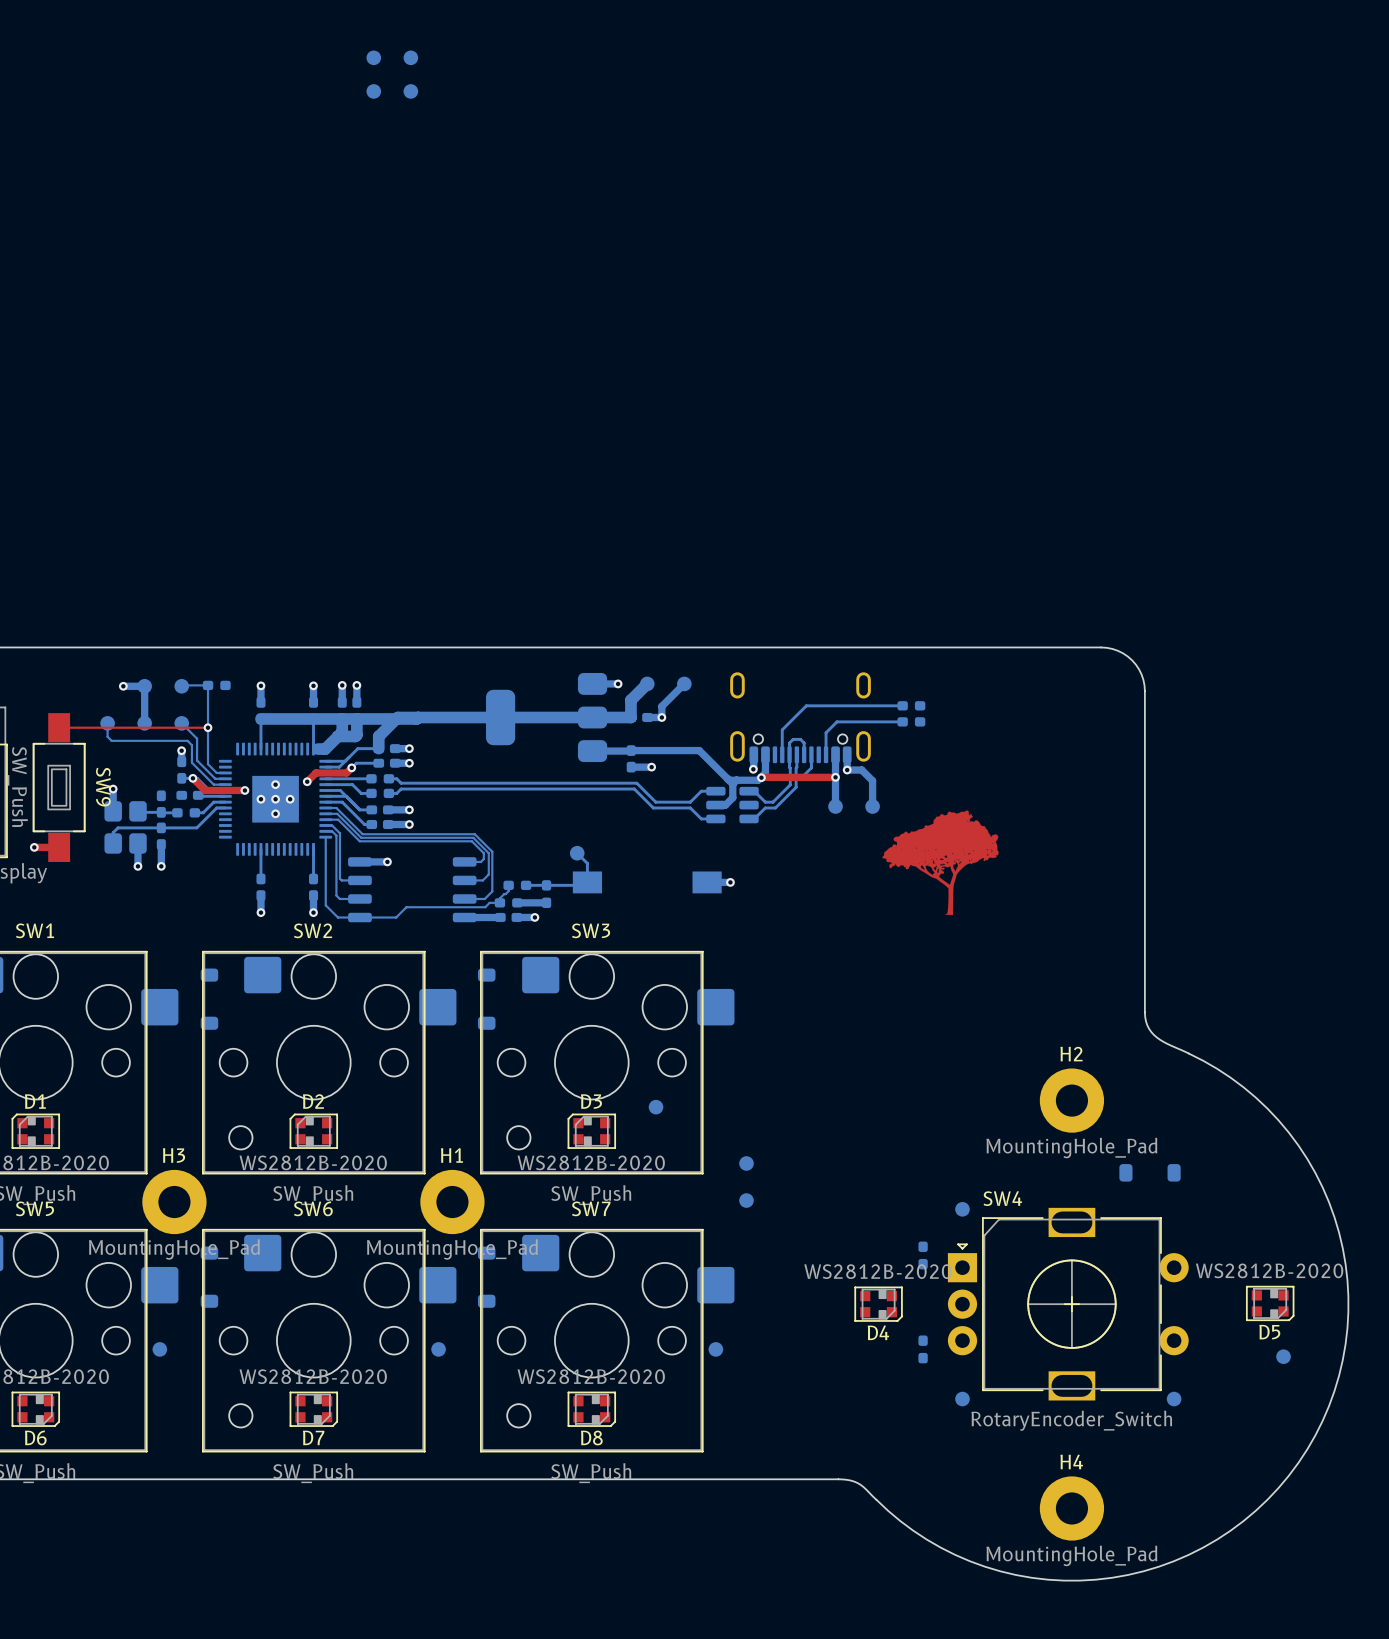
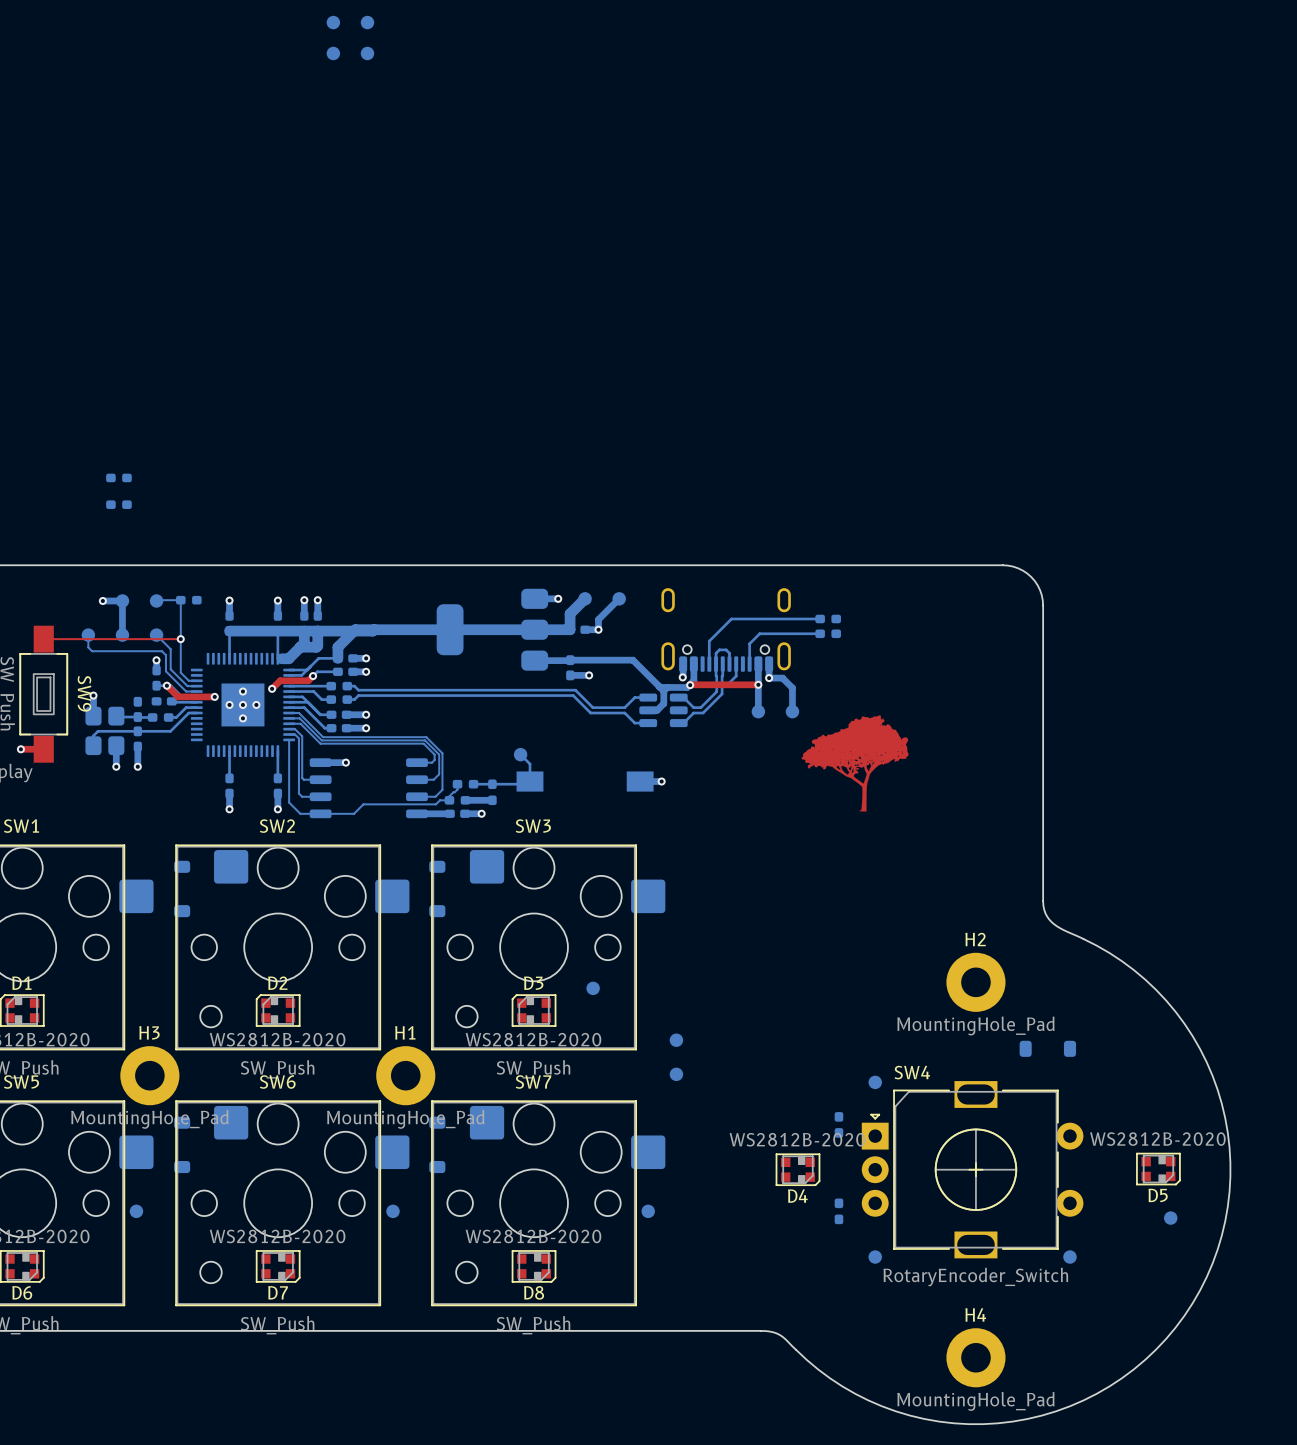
part: none -> (118, 477)
part: none -> (118, 504)

